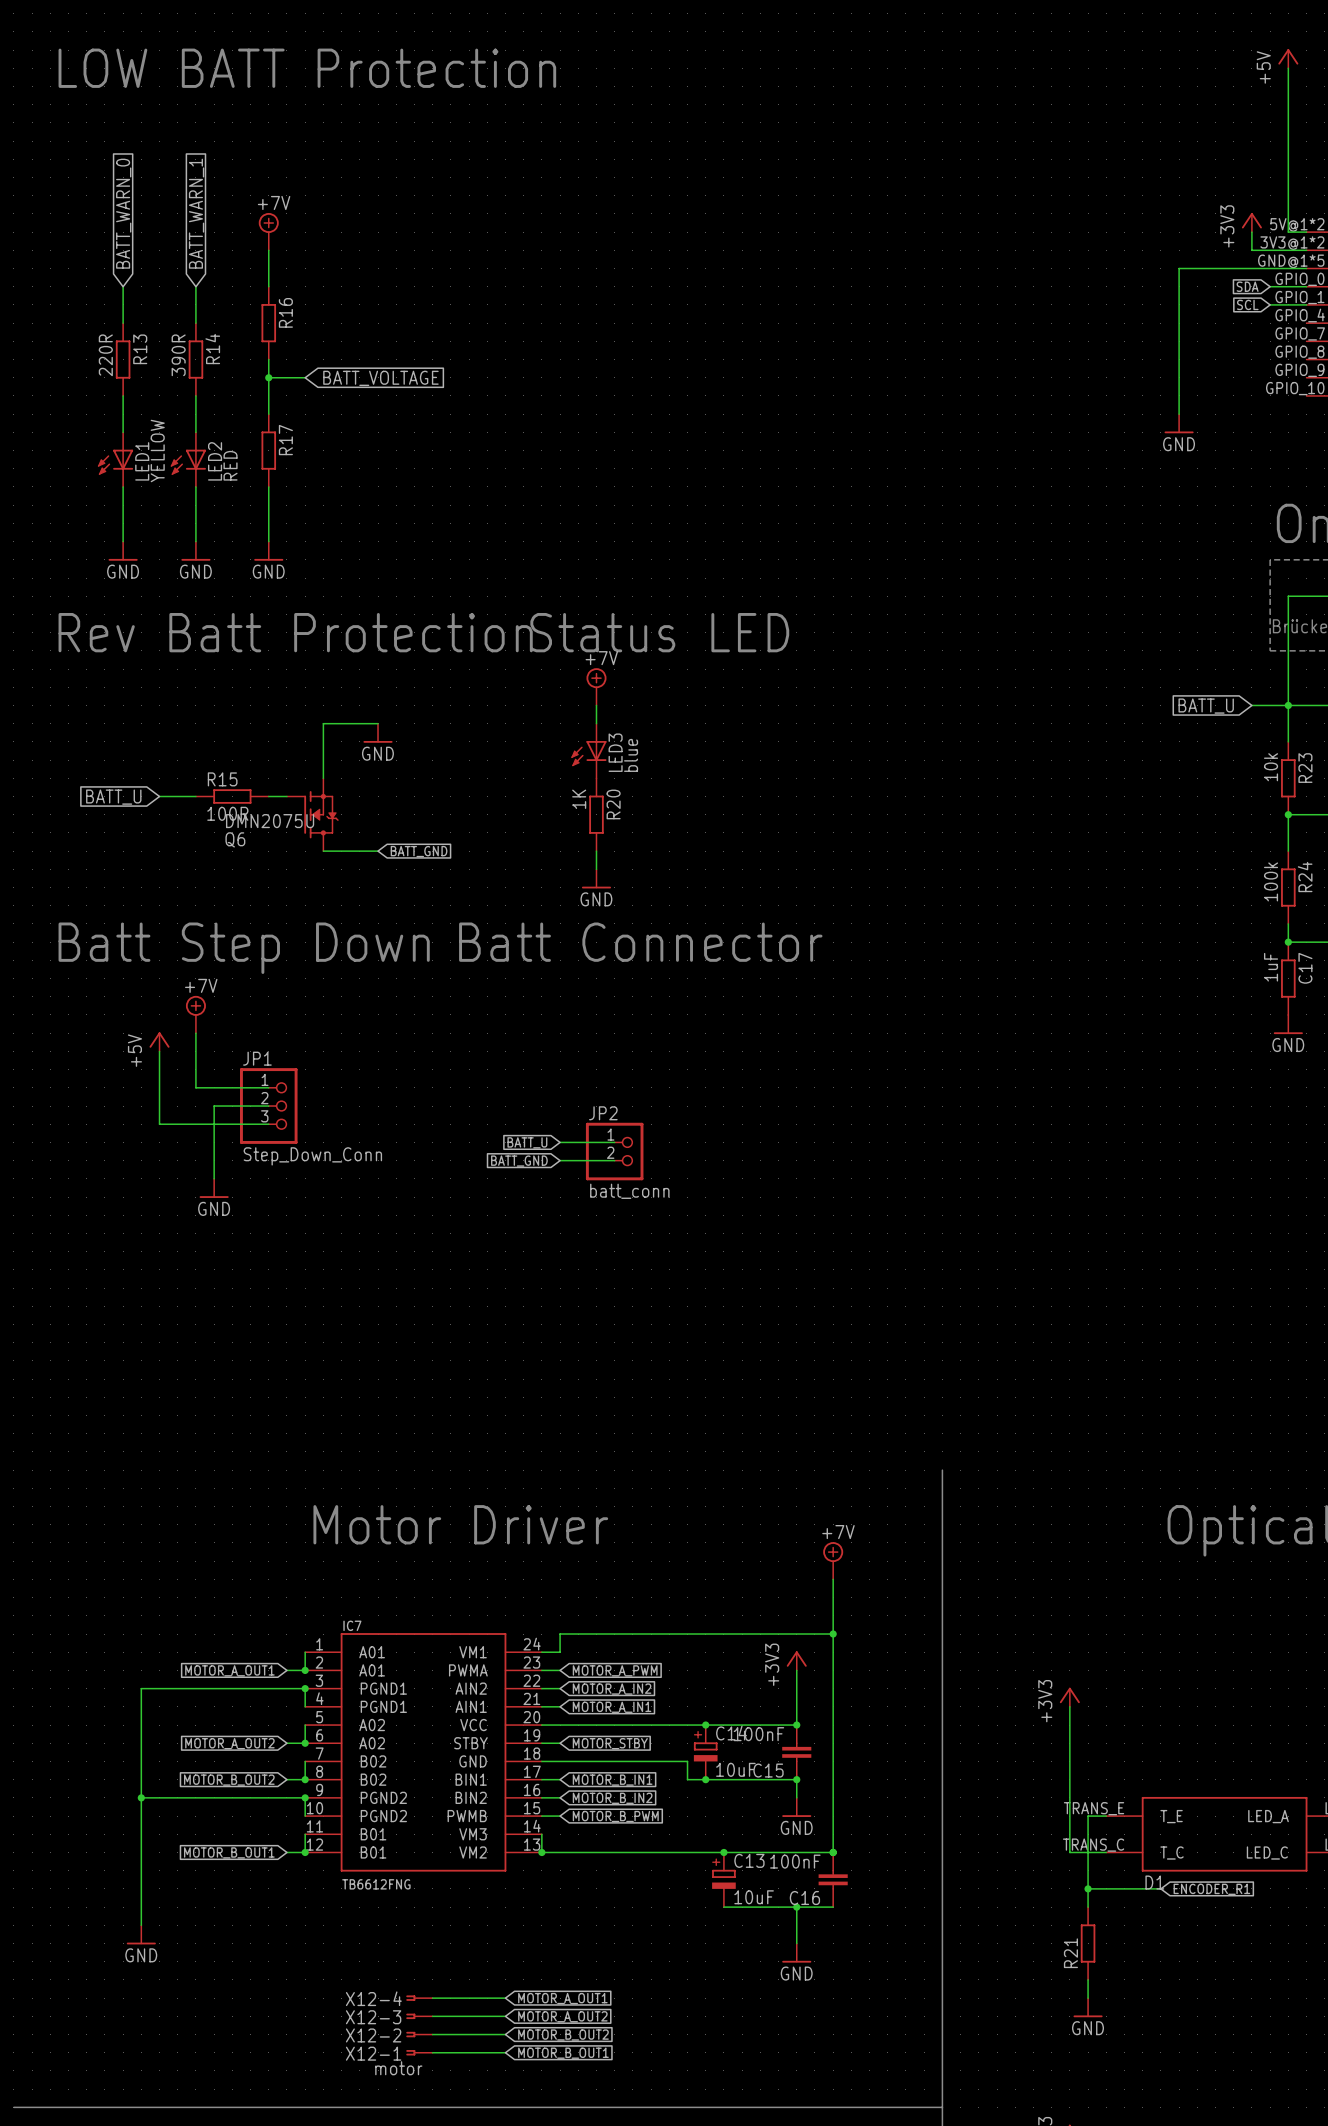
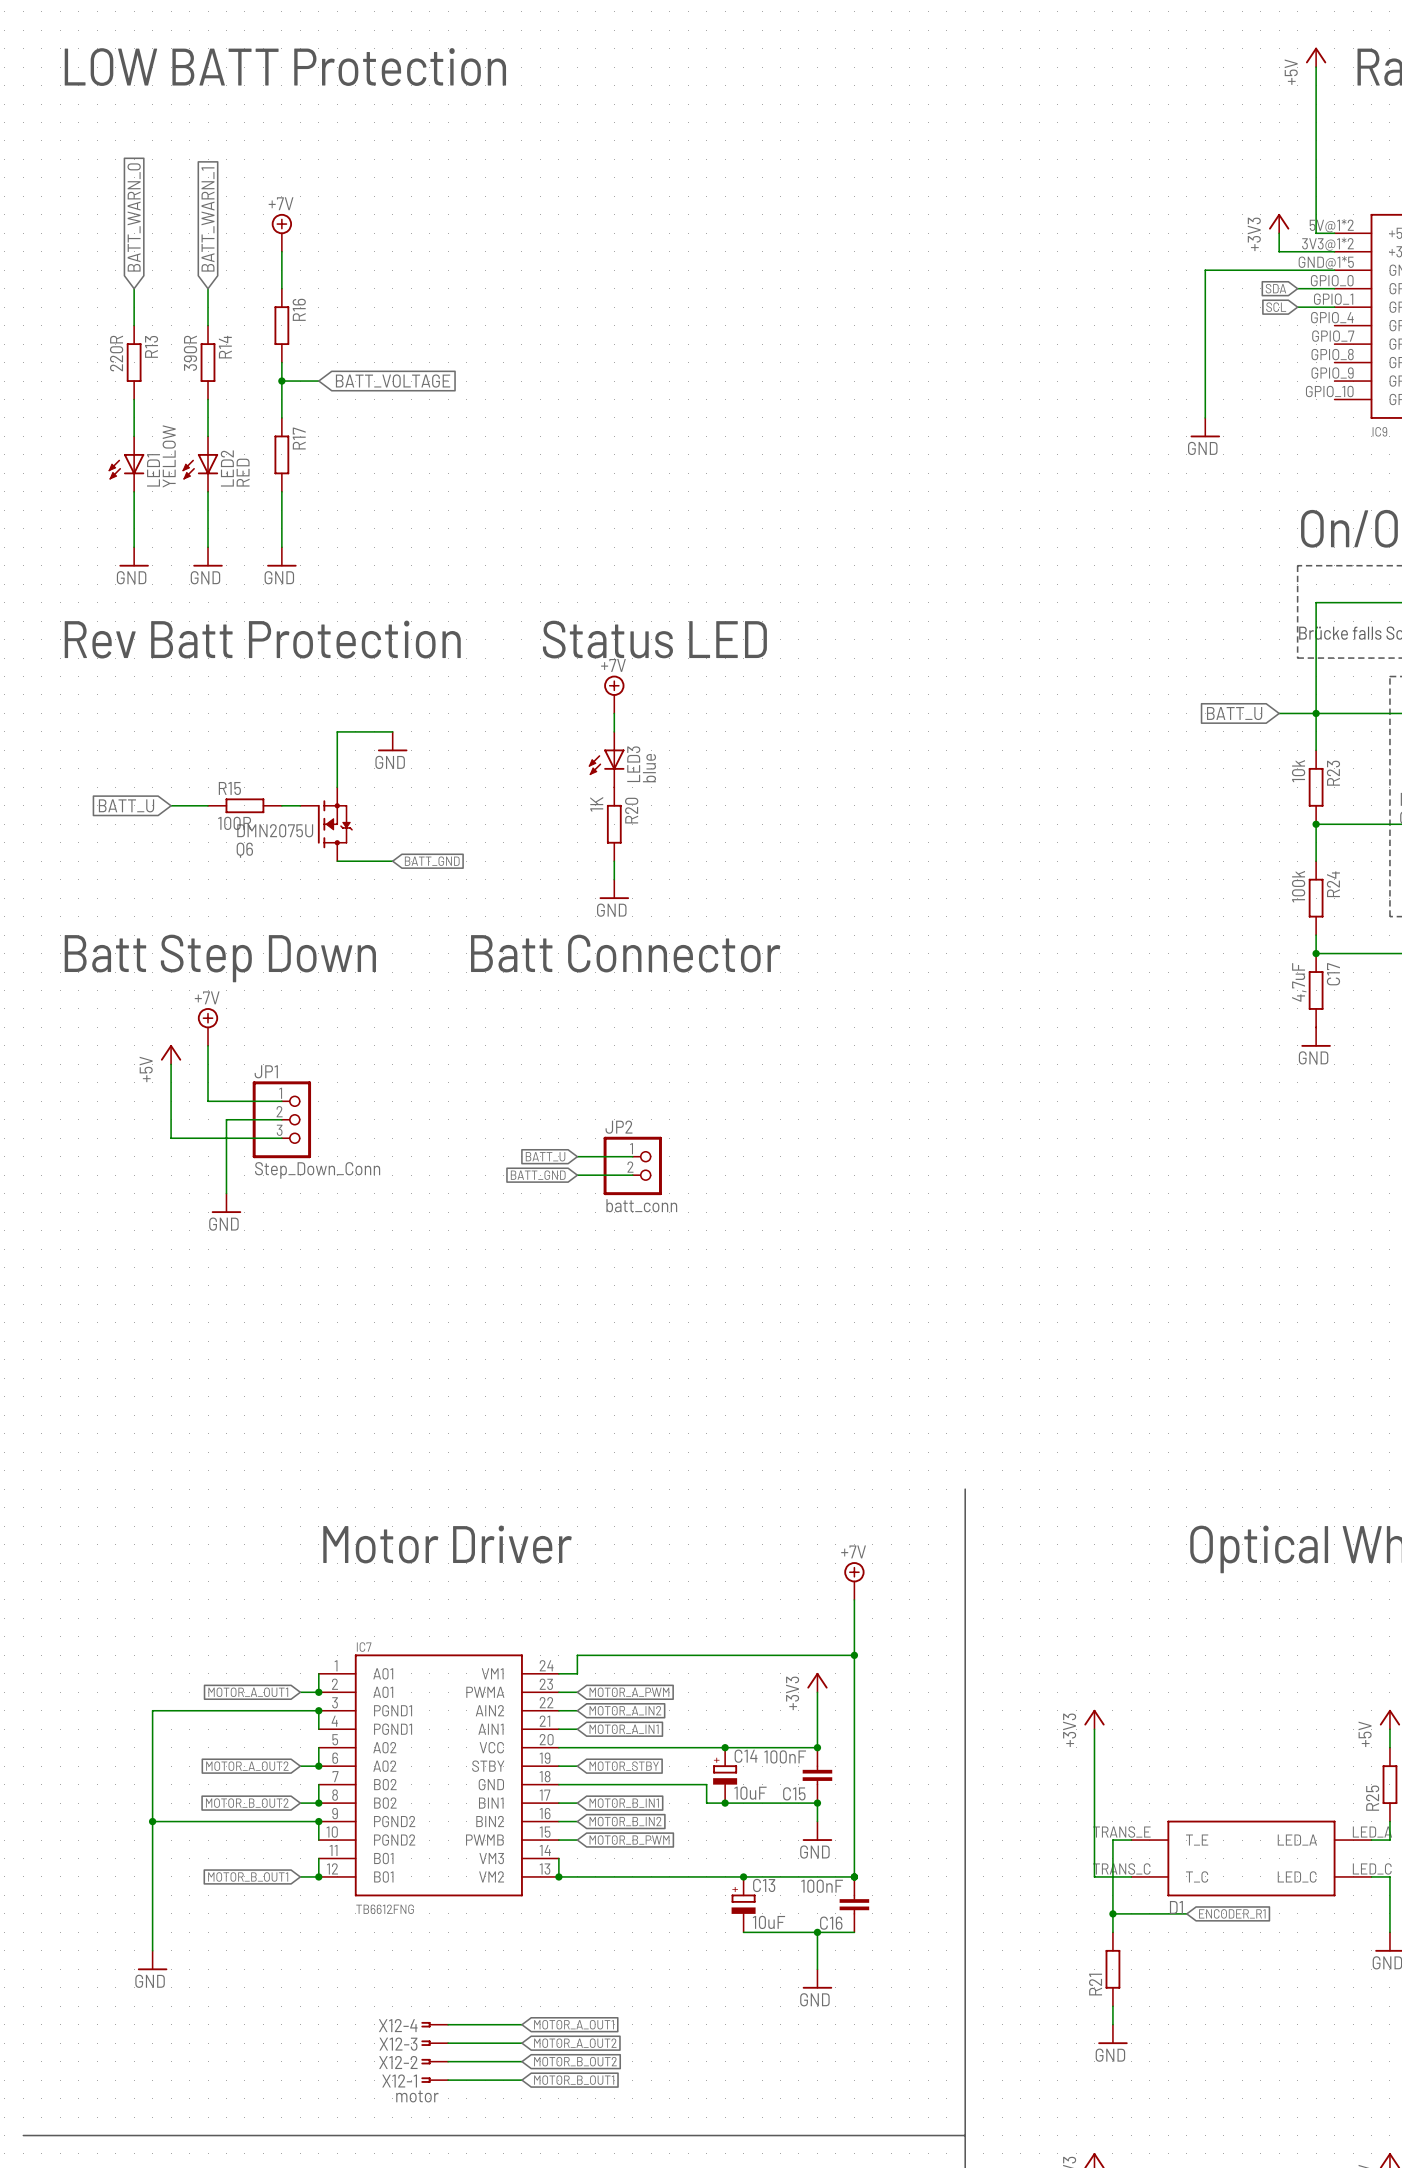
C17 value: 1uF (1271, 967) -> 4,7uF (1299, 982)

